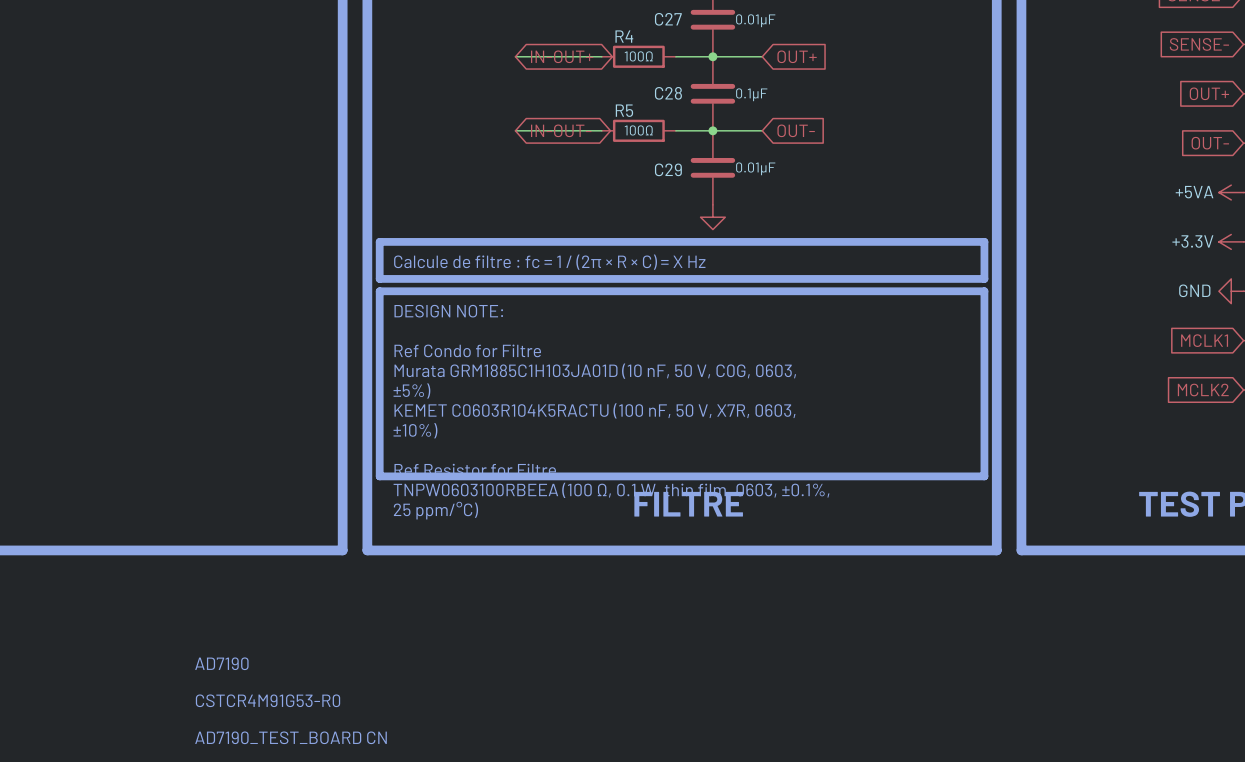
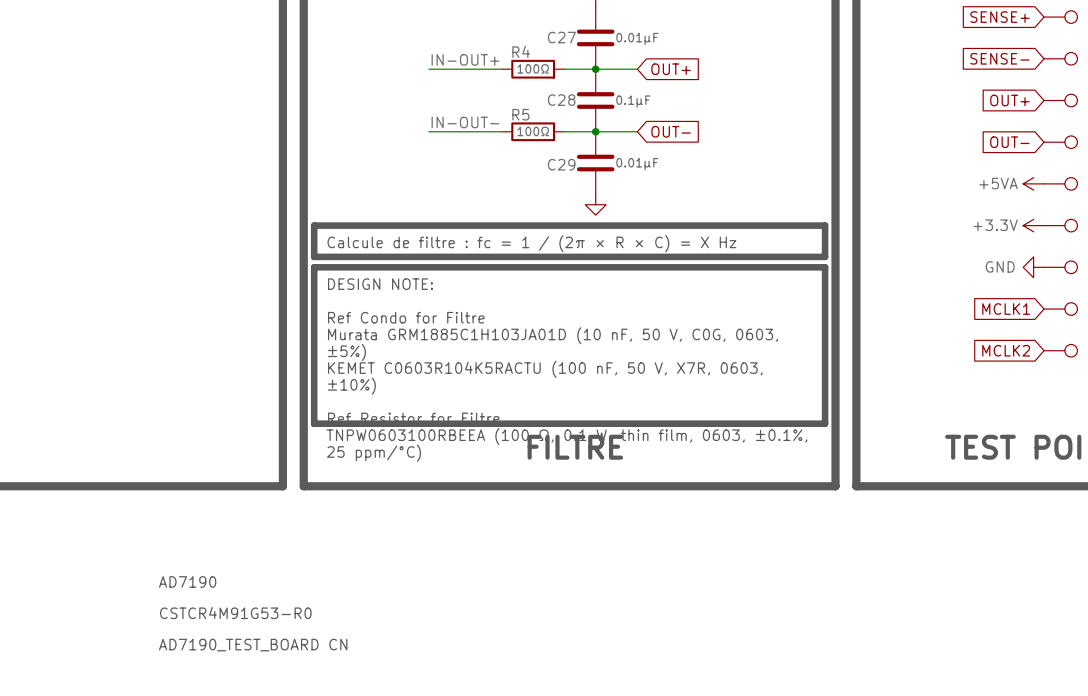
label: none -> IN-OUT+ (465, 59)
global label: IN-OUT+ (562, 56) -> none
label: none -> IN-OUT- (465, 122)
global label: IN-OUT- (561, 130) -> none

